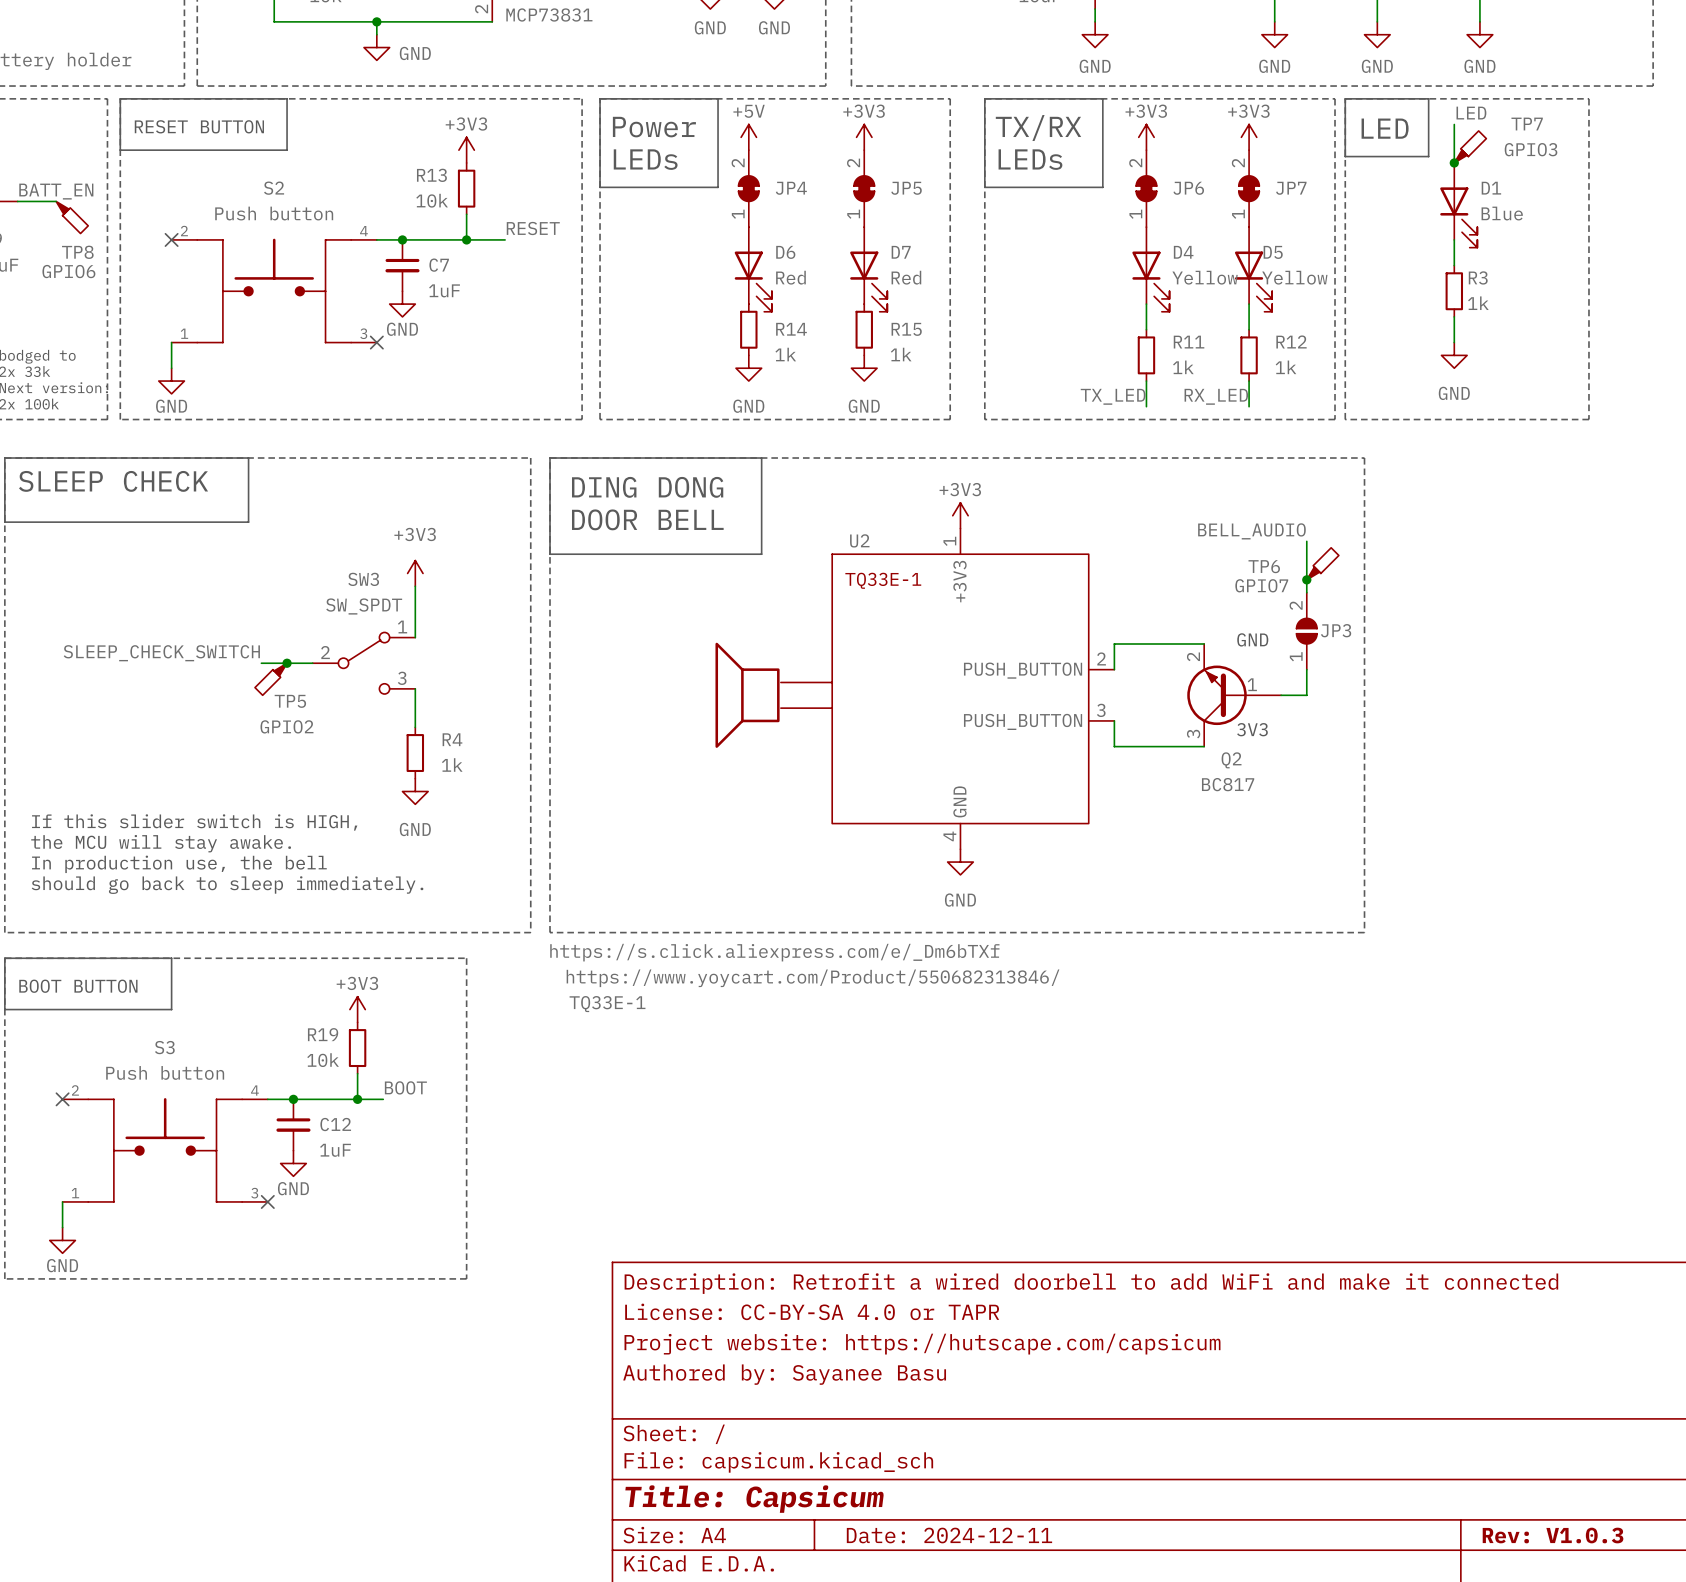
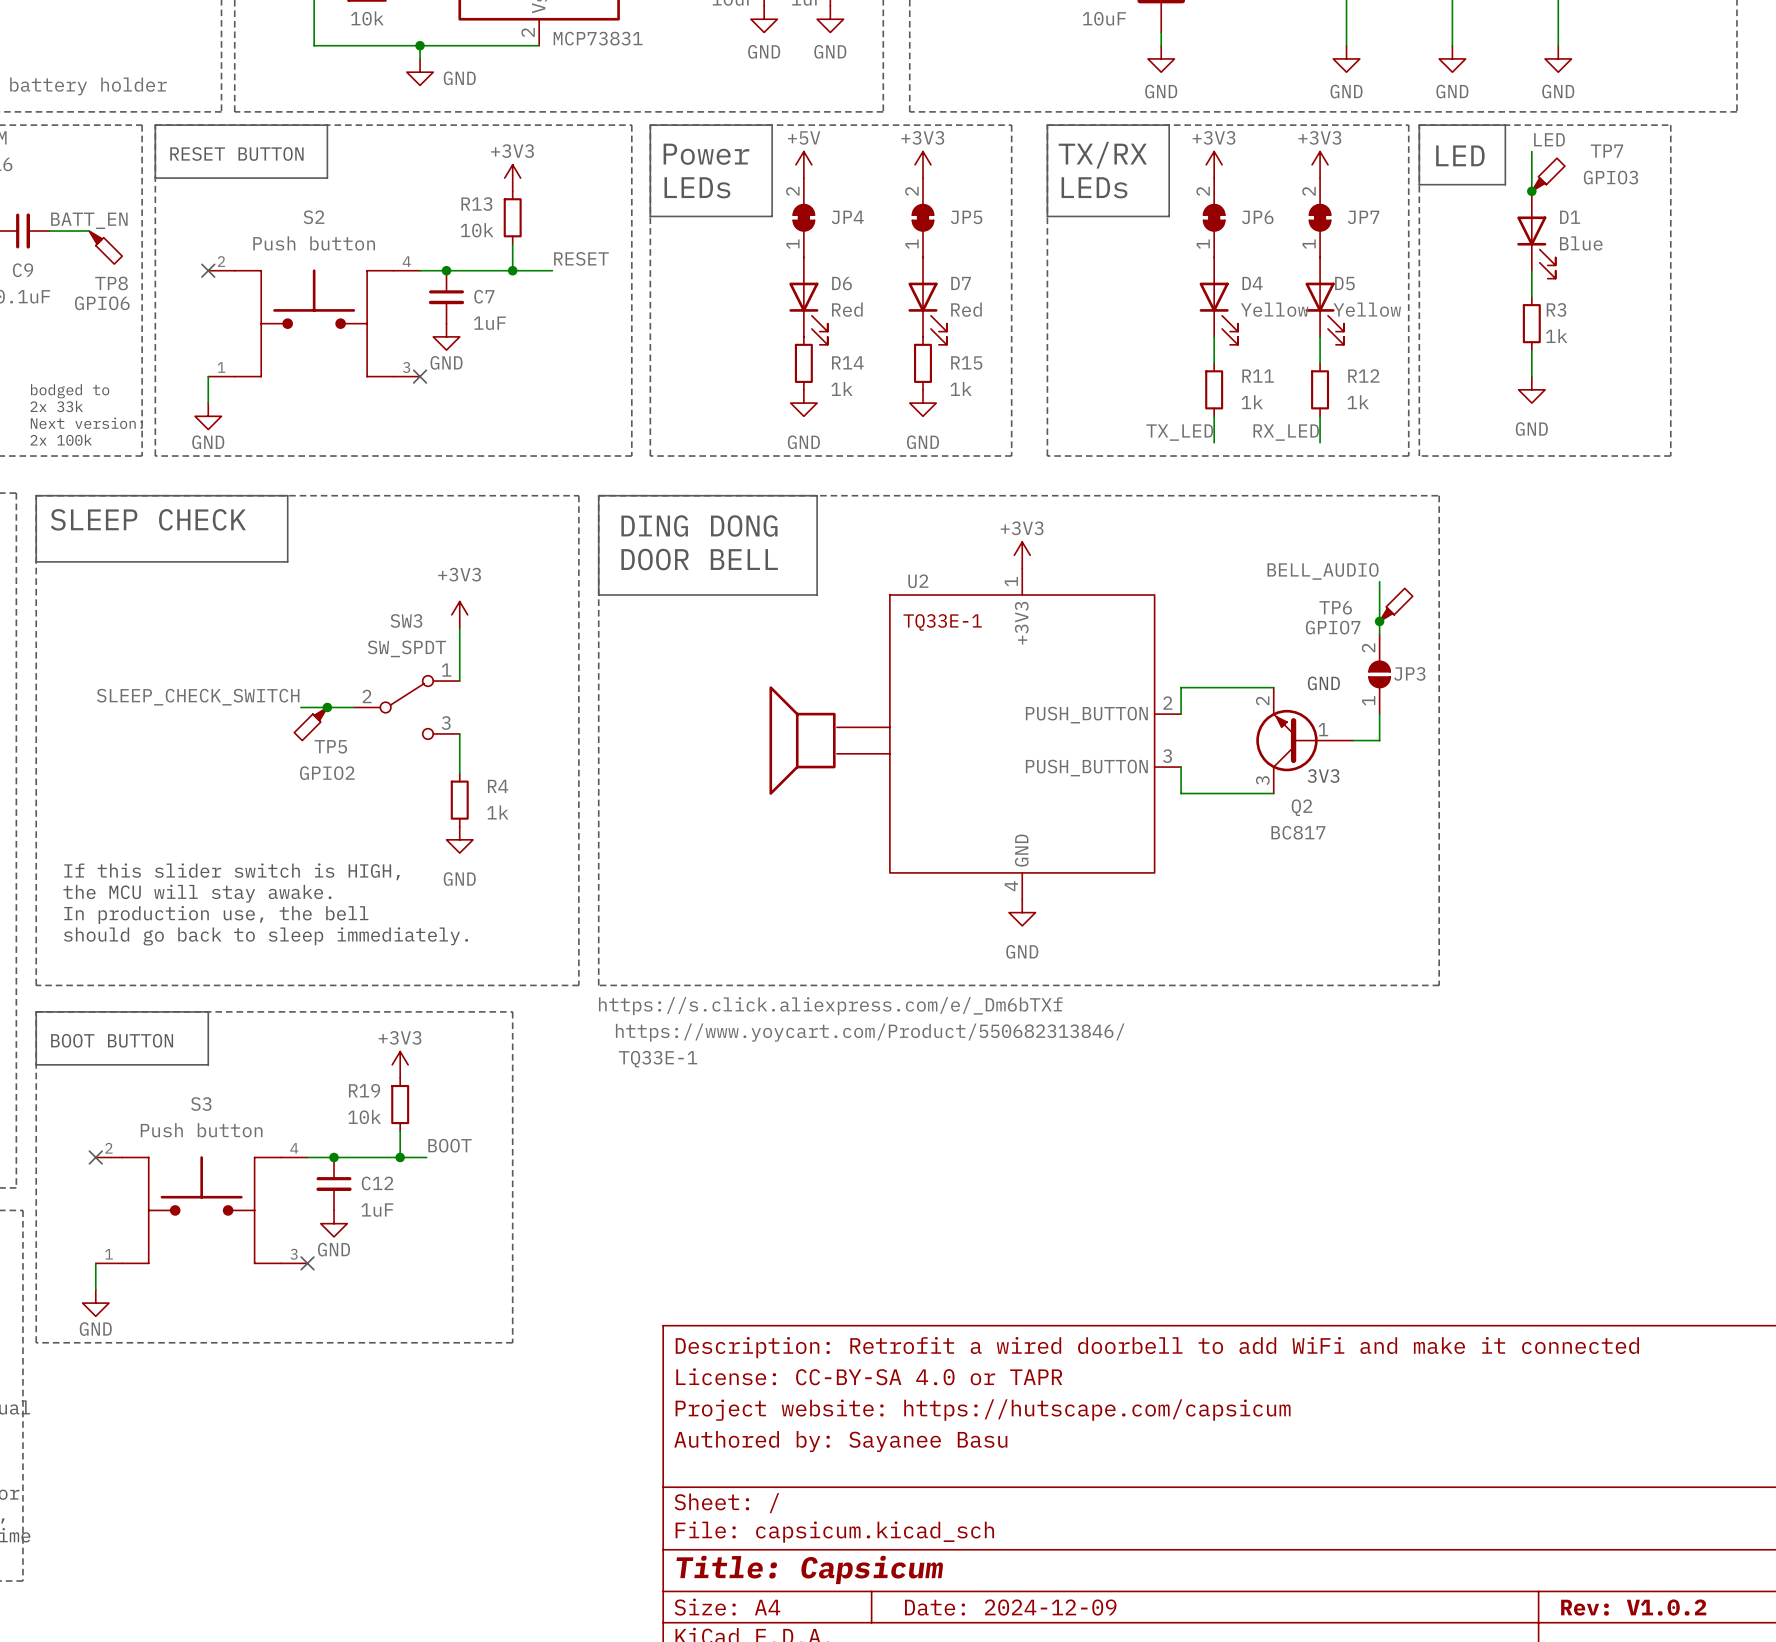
title block: Date: 2024-12-11 (949, 1535) -> Date: 2024-12-09 (1010, 1607)
title block: Rev: V1.0.3 (1553, 1535) -> Rev: V1.0.2 (1633, 1607)

